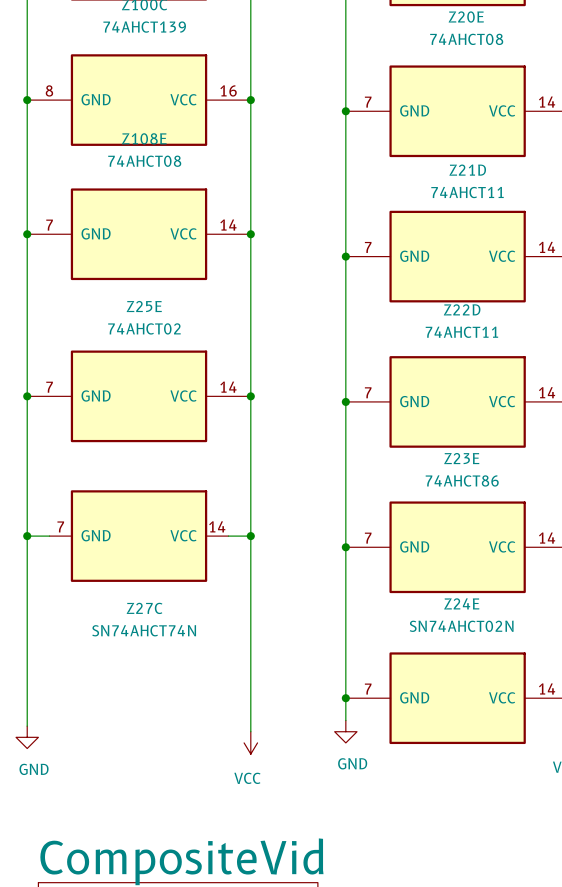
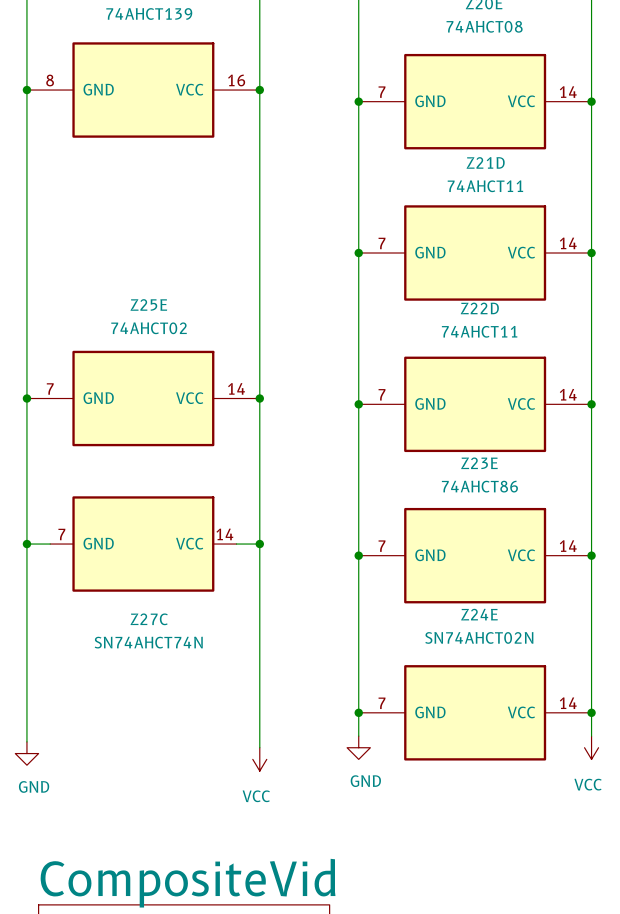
junction: (27, 234) -> none
Z108E: 74AHCT08 (139, 234) -> none
junction: (250, 234) -> none

